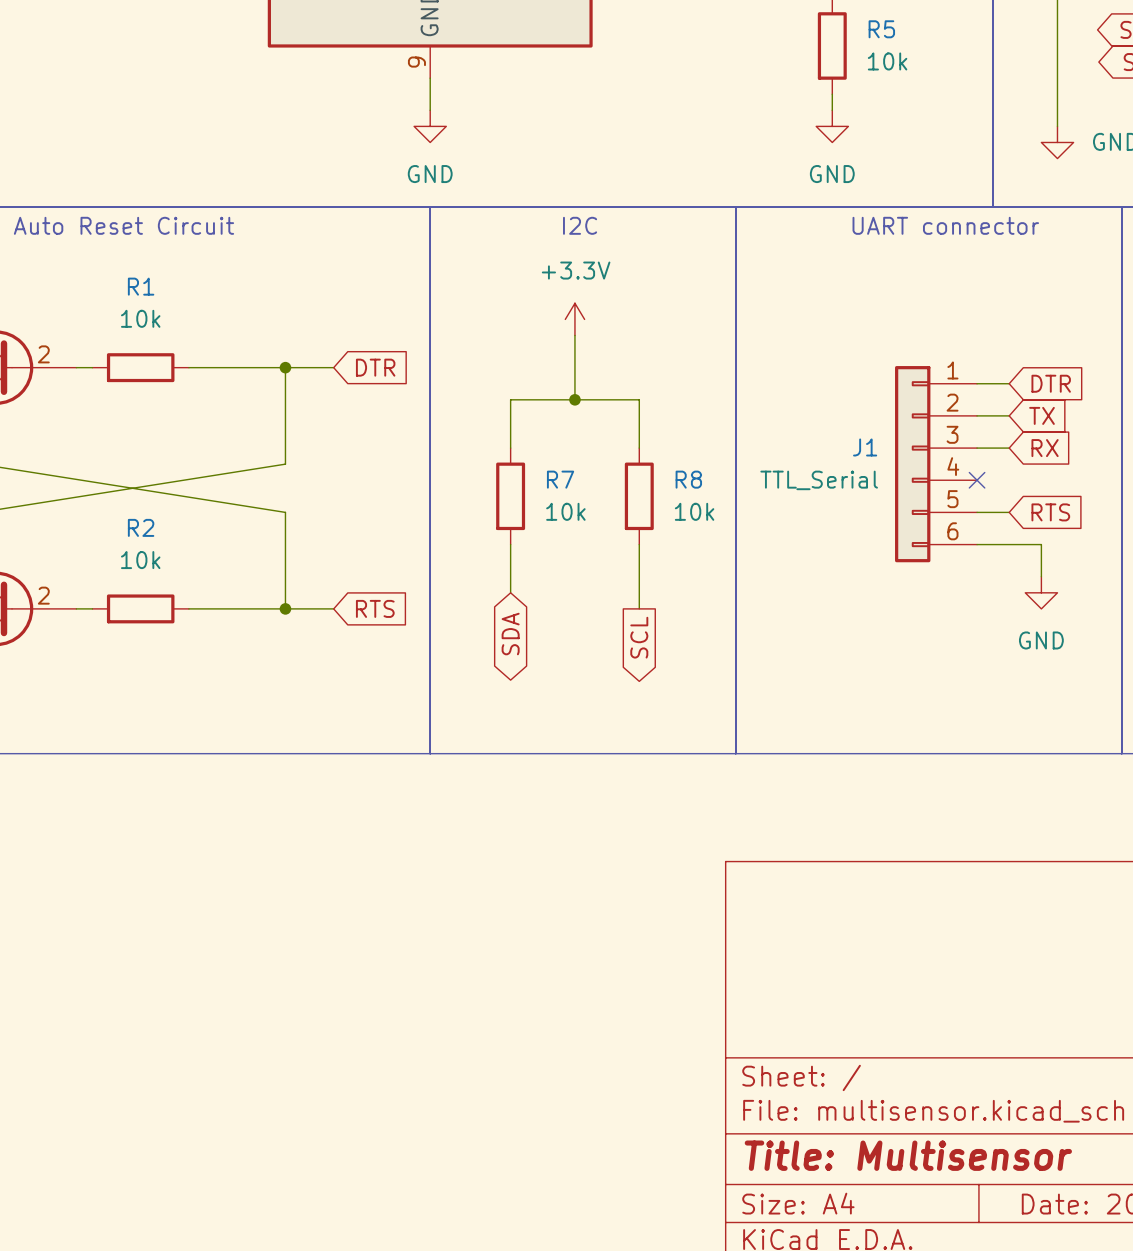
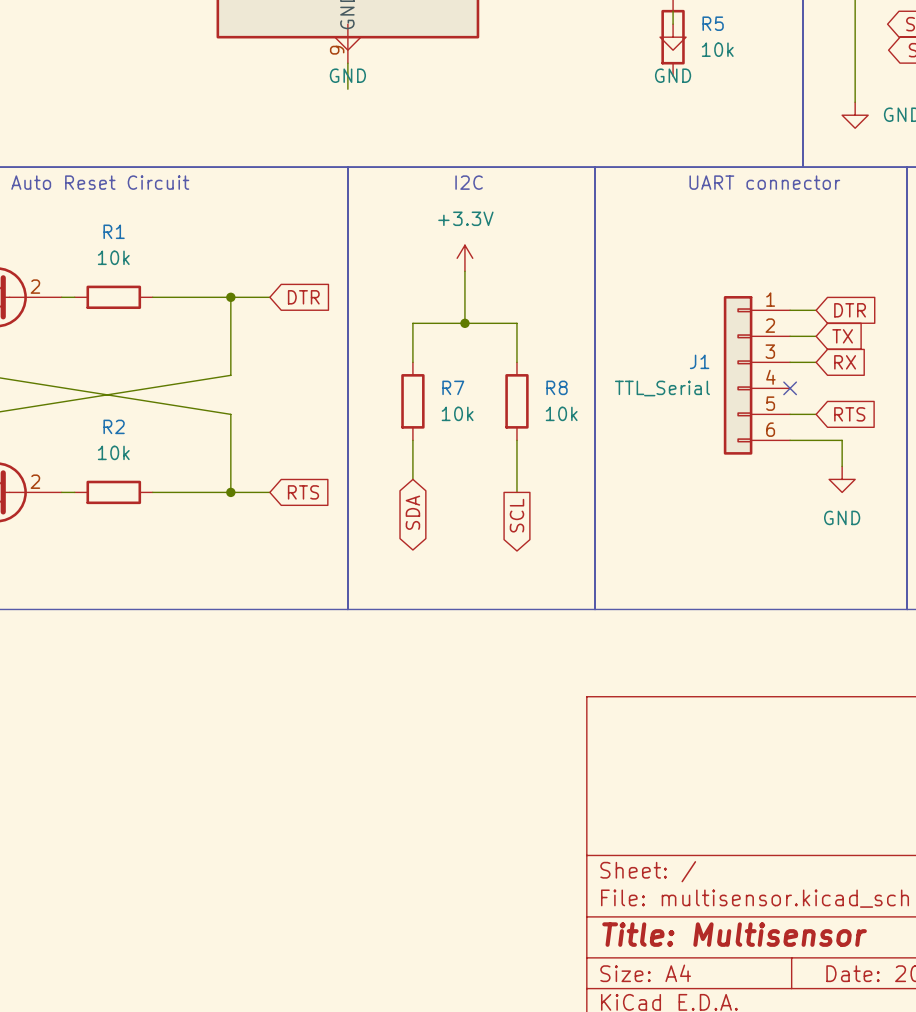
wire: (832, 94) (832, 110) -> (673, 11) (673, 24)
power symbol position: GND (430, 126) -> GND (347, 37)
power symbol position: GND (832, 126) -> GND (673, 37)

